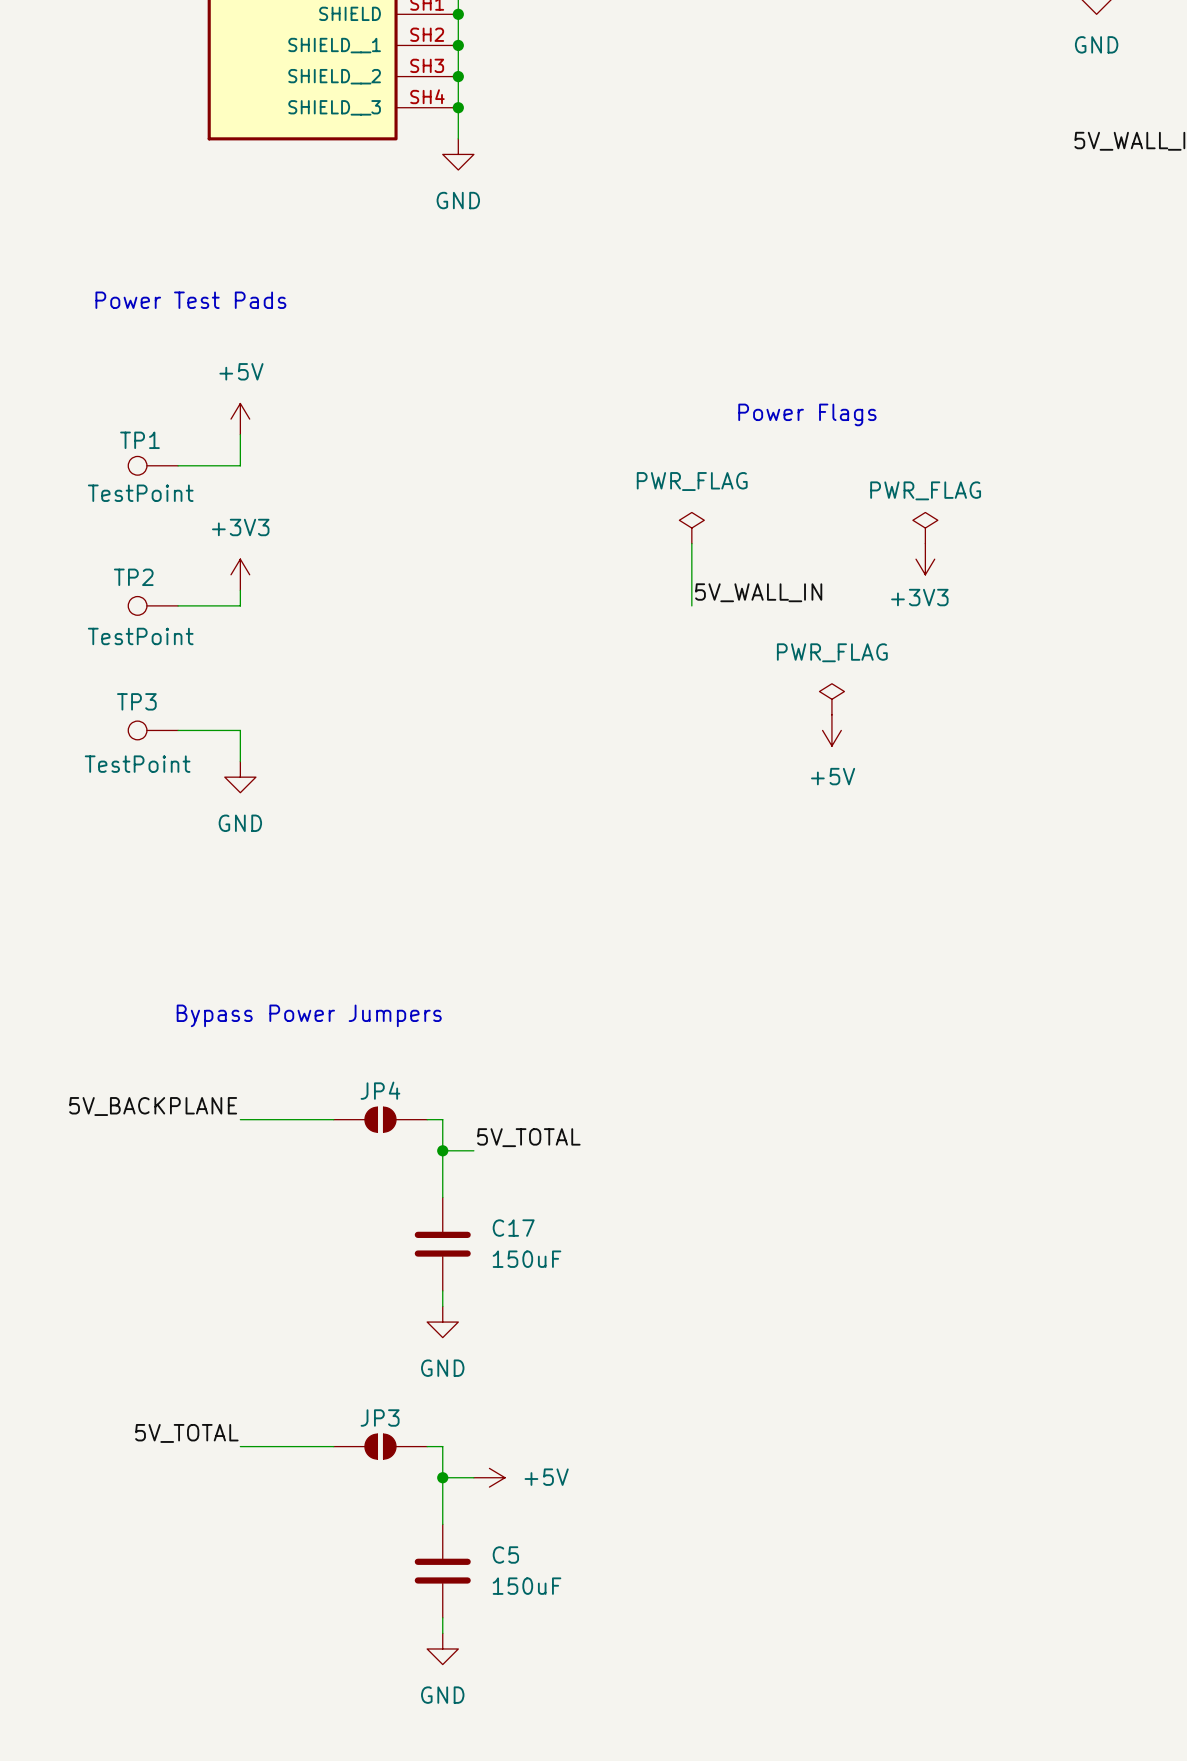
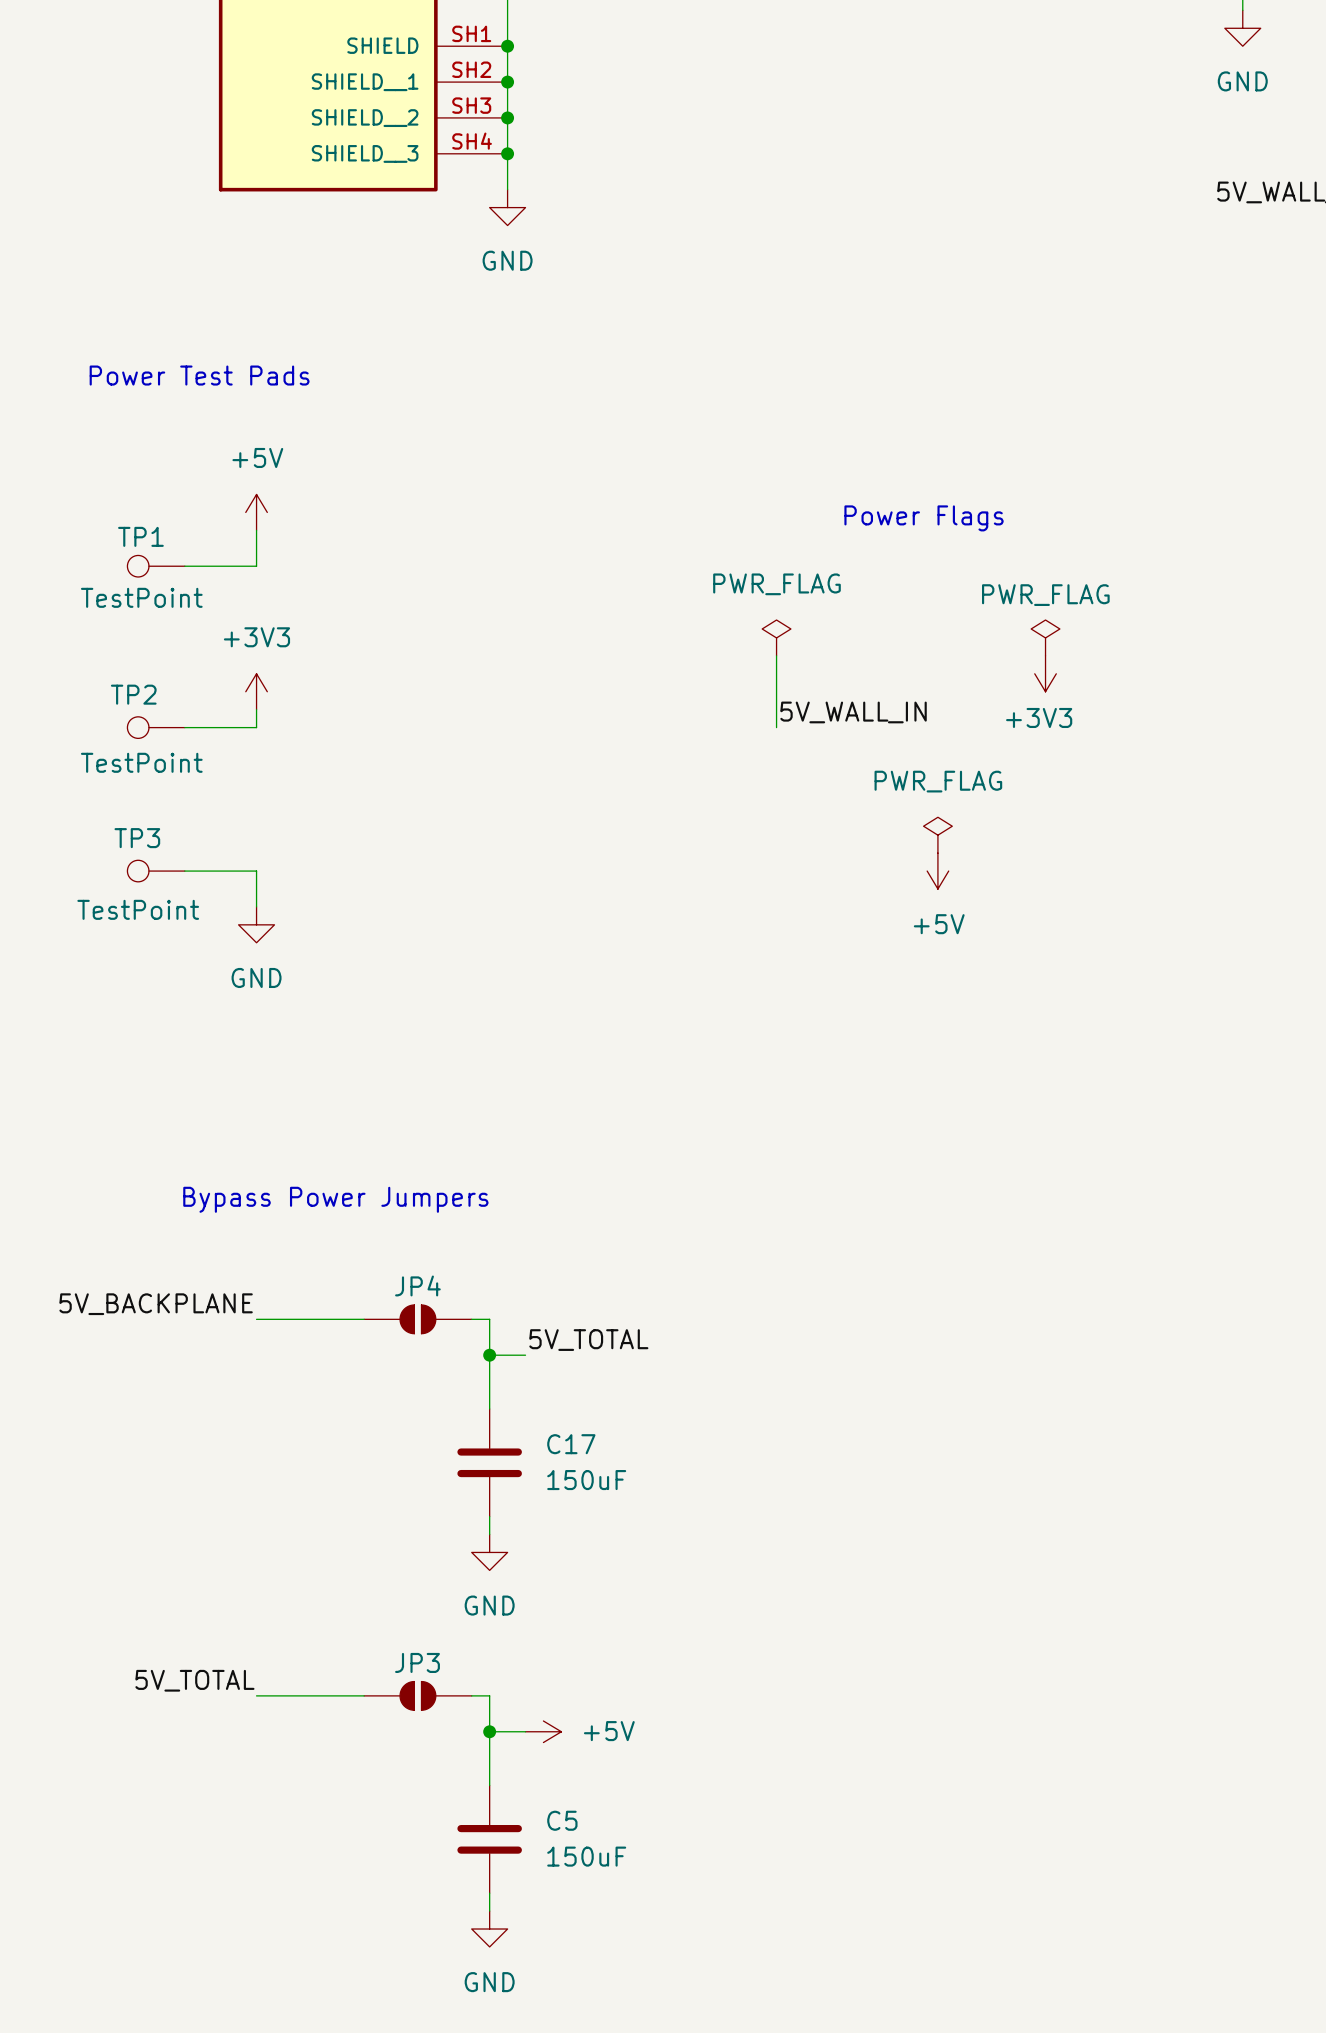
text position: Power Flags (807, 414) -> Power Flags (924, 518)

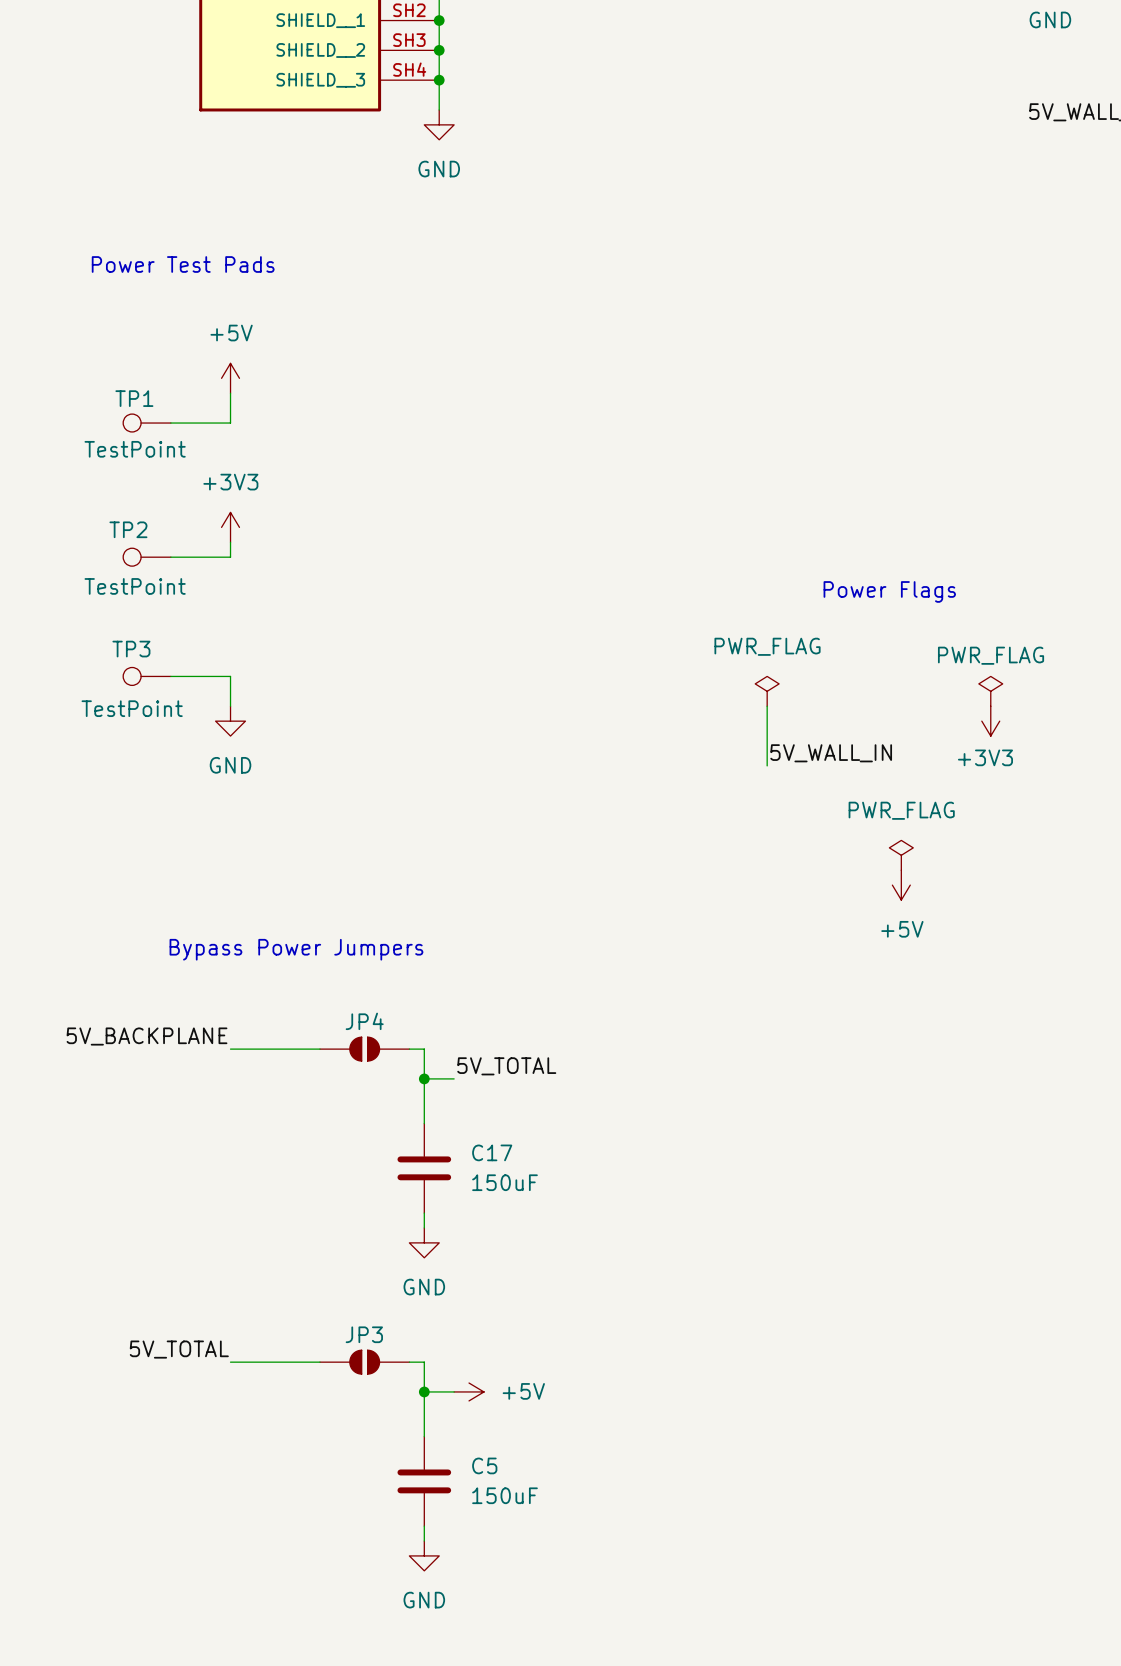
text position: Power Flags (924, 518) -> Power Flags (889, 591)
power symbol: PWR_FLAG (776, 637) -> none
power symbol: PWR_FLAG (1045, 637) -> none
wire: (776, 655) (776, 727) -> (767, 706) (767, 765)
power symbol position: +3V3 (1045, 673) -> +3V3 (990, 721)
label position: 5V_WALL_IN (853, 712) -> 5V_WALL_IN (831, 753)
power symbol position: PWR_FLAG (937, 835) -> PWR_FLAG (767, 691)
power symbol position: +5V (937, 871) -> +5V (901, 885)
power symbol: none -> PWR_FLAG (990, 691)
power symbol: none -> PWR_FLAG (901, 855)

